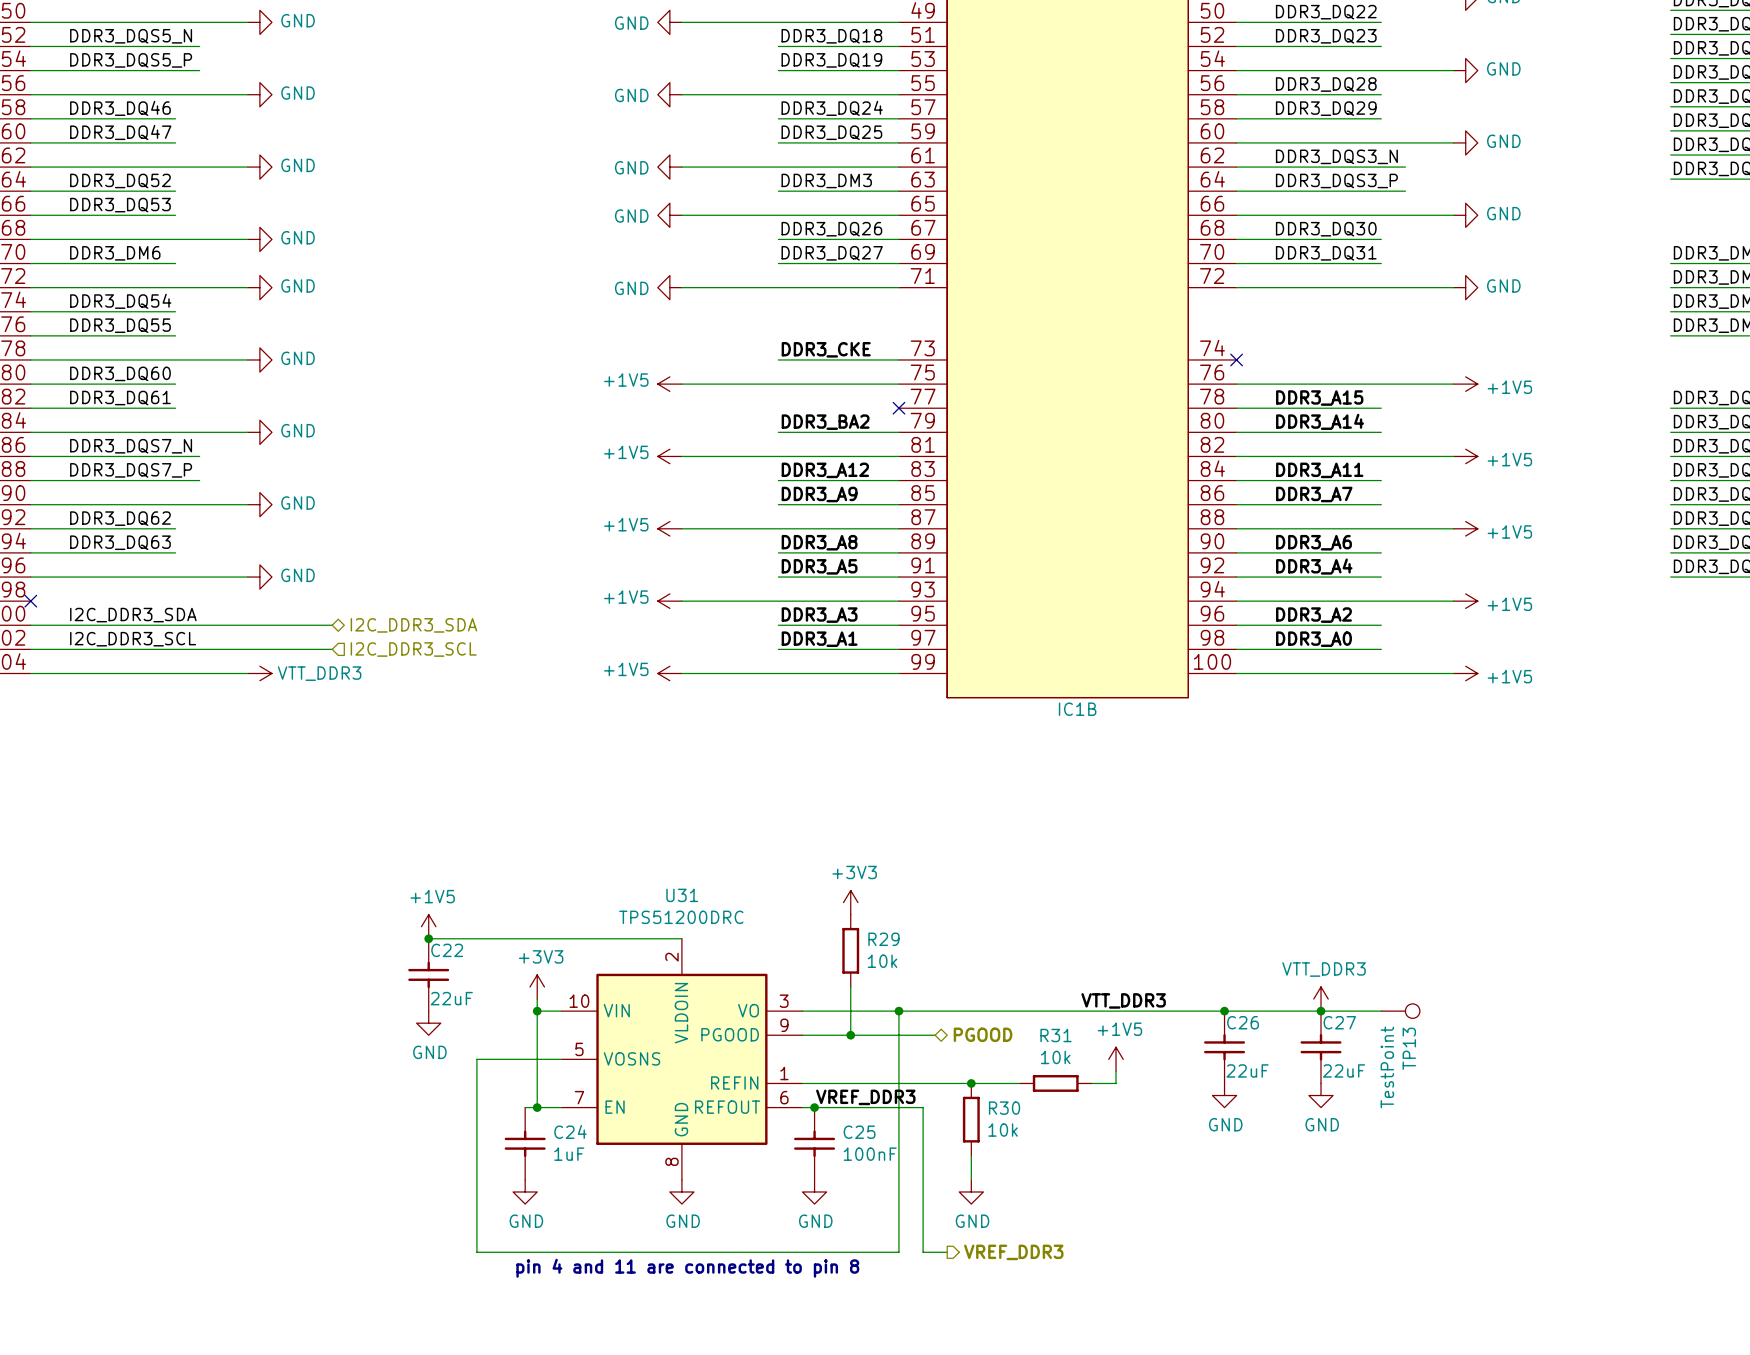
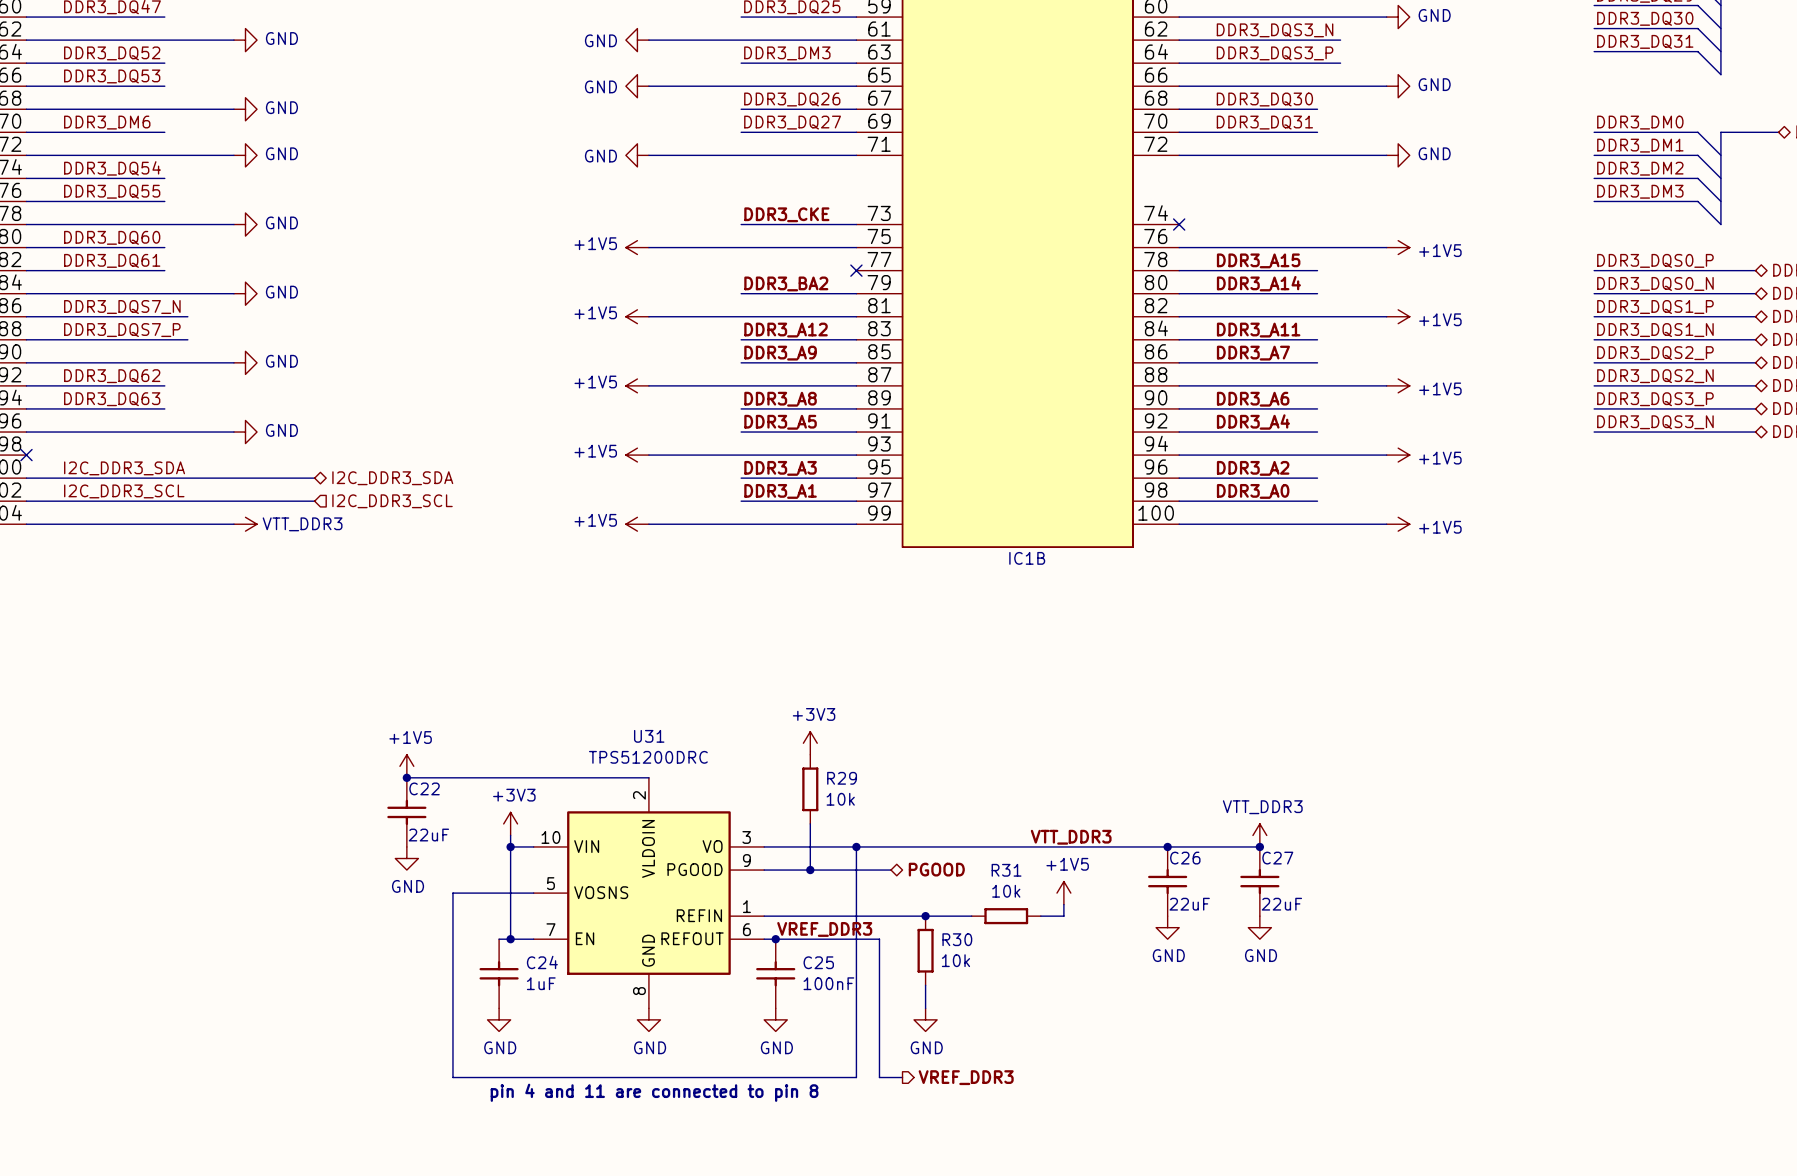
wire: (1321, 1011) (1381, 1011) -> none
TP13: TestPoint (1400, 1011) -> none

